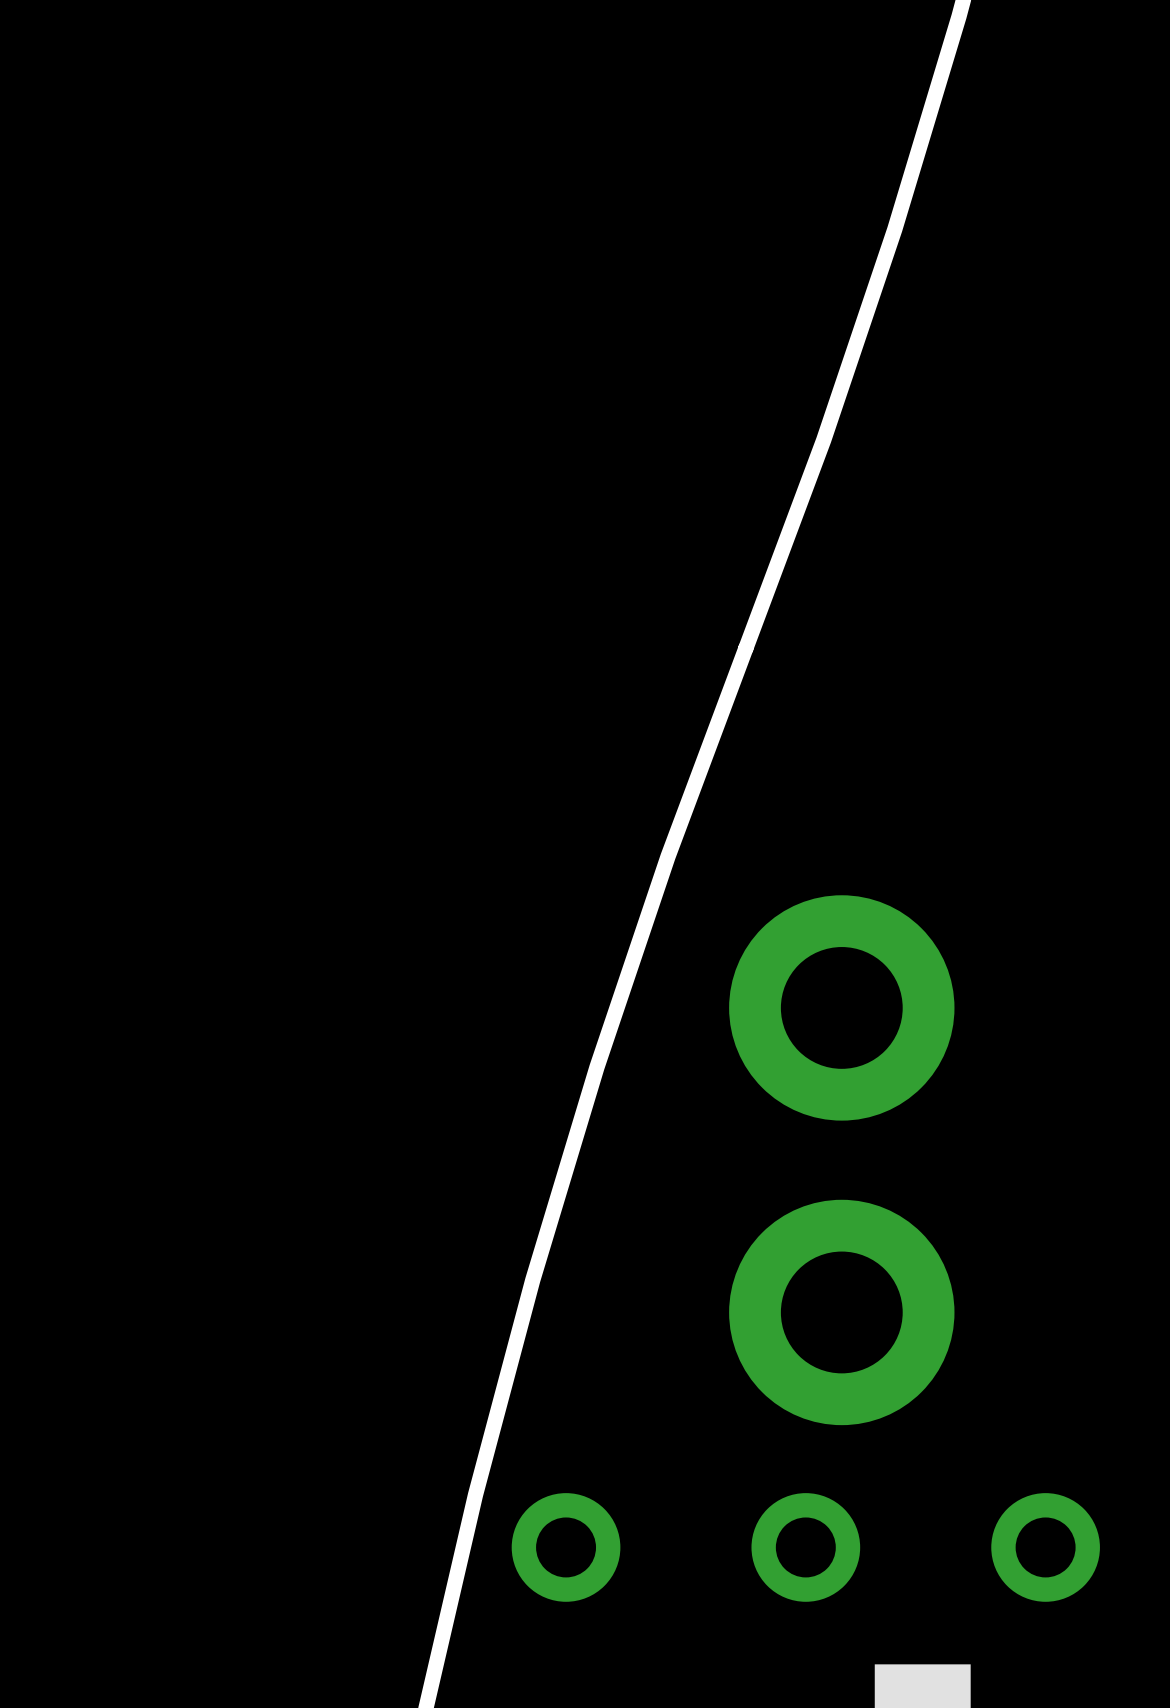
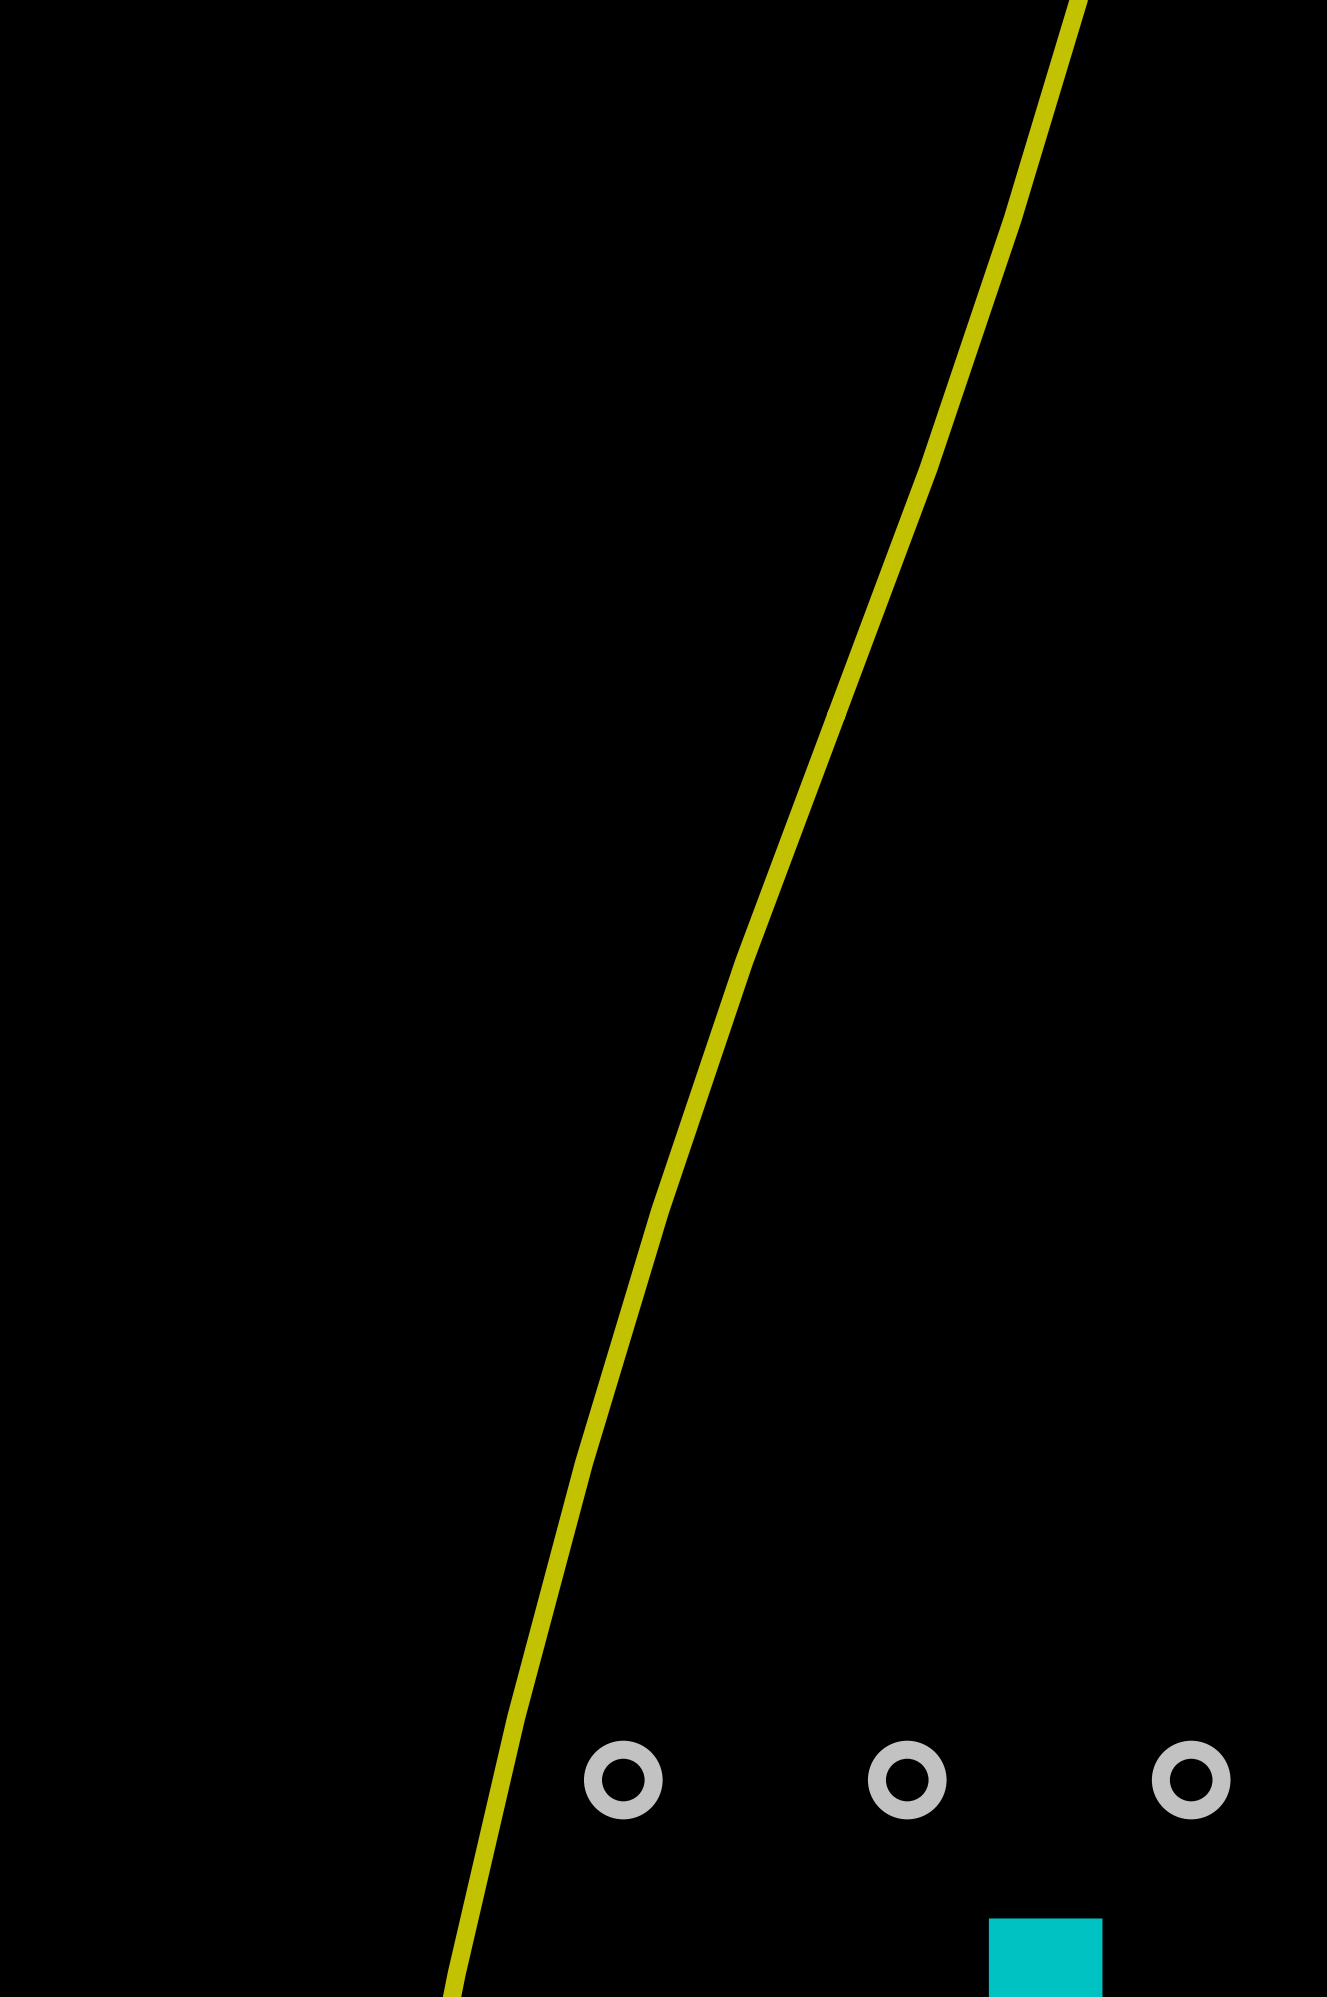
part: (841, 1160) -> none
via size: [511, 1493, 621, 1602] -> [583, 1740, 663, 1820]
via size: [751, 1493, 861, 1602] -> [867, 1740, 947, 1820]
via size: [991, 1493, 1100, 1602] -> [1151, 1740, 1231, 1820]

